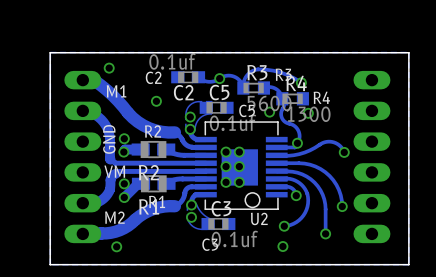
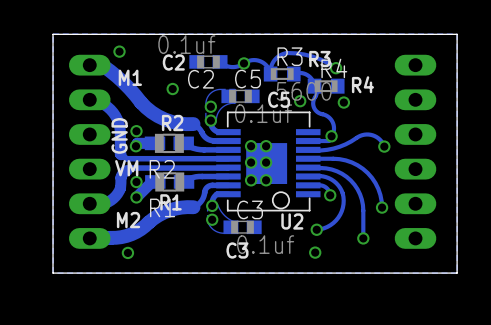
R4 value: 1300 (308, 114) -> none

